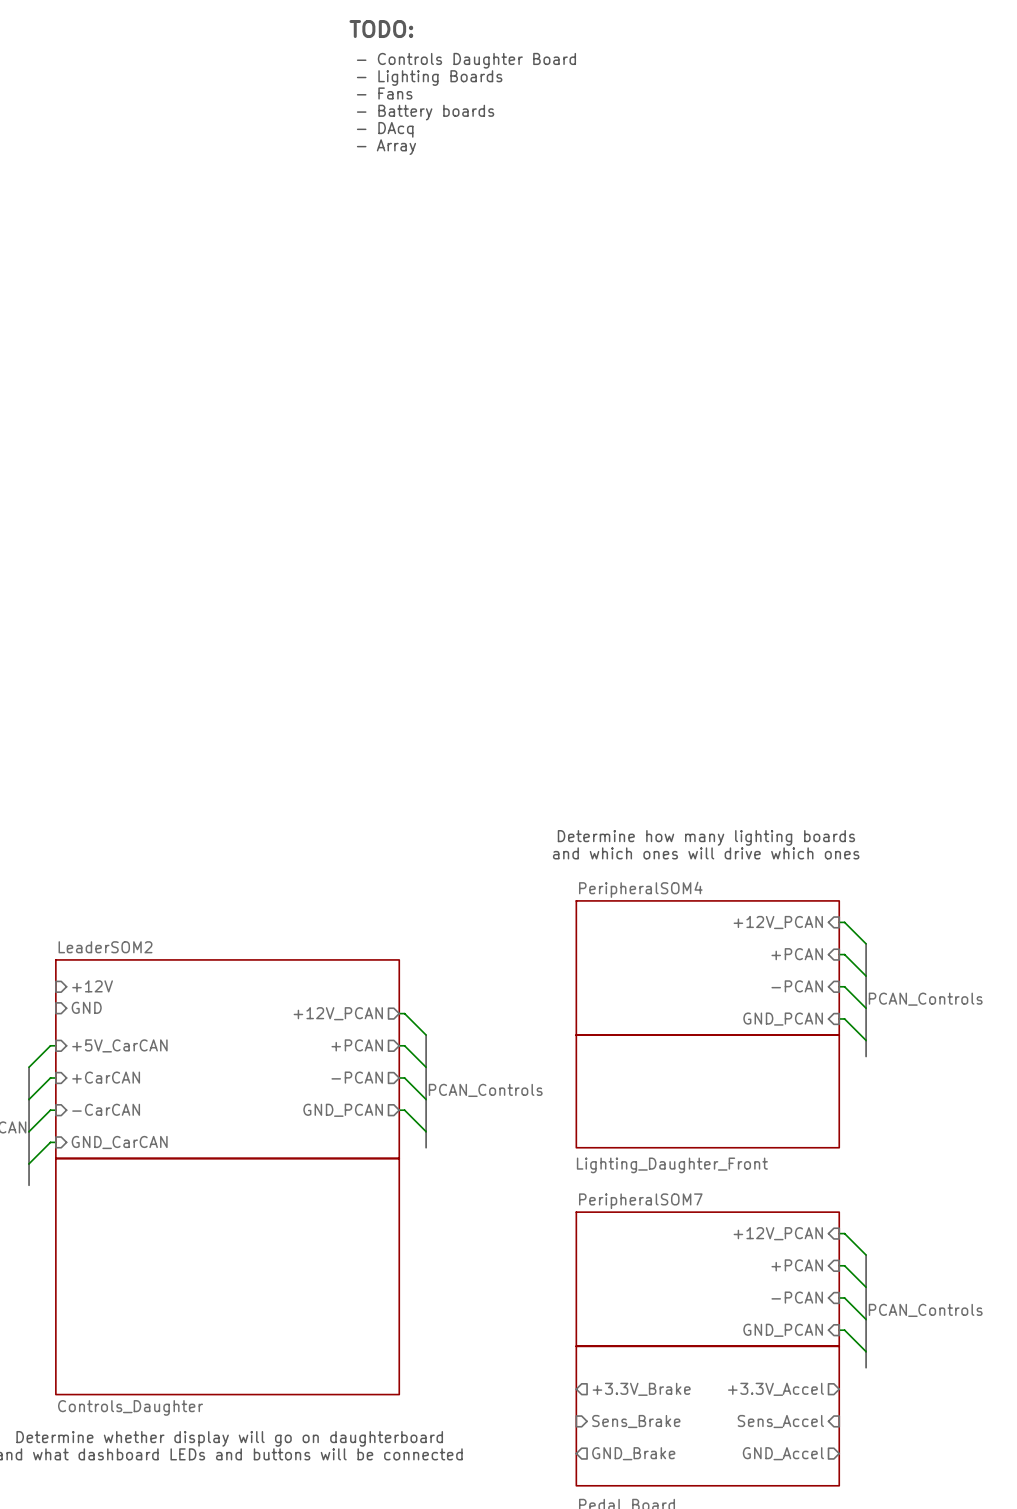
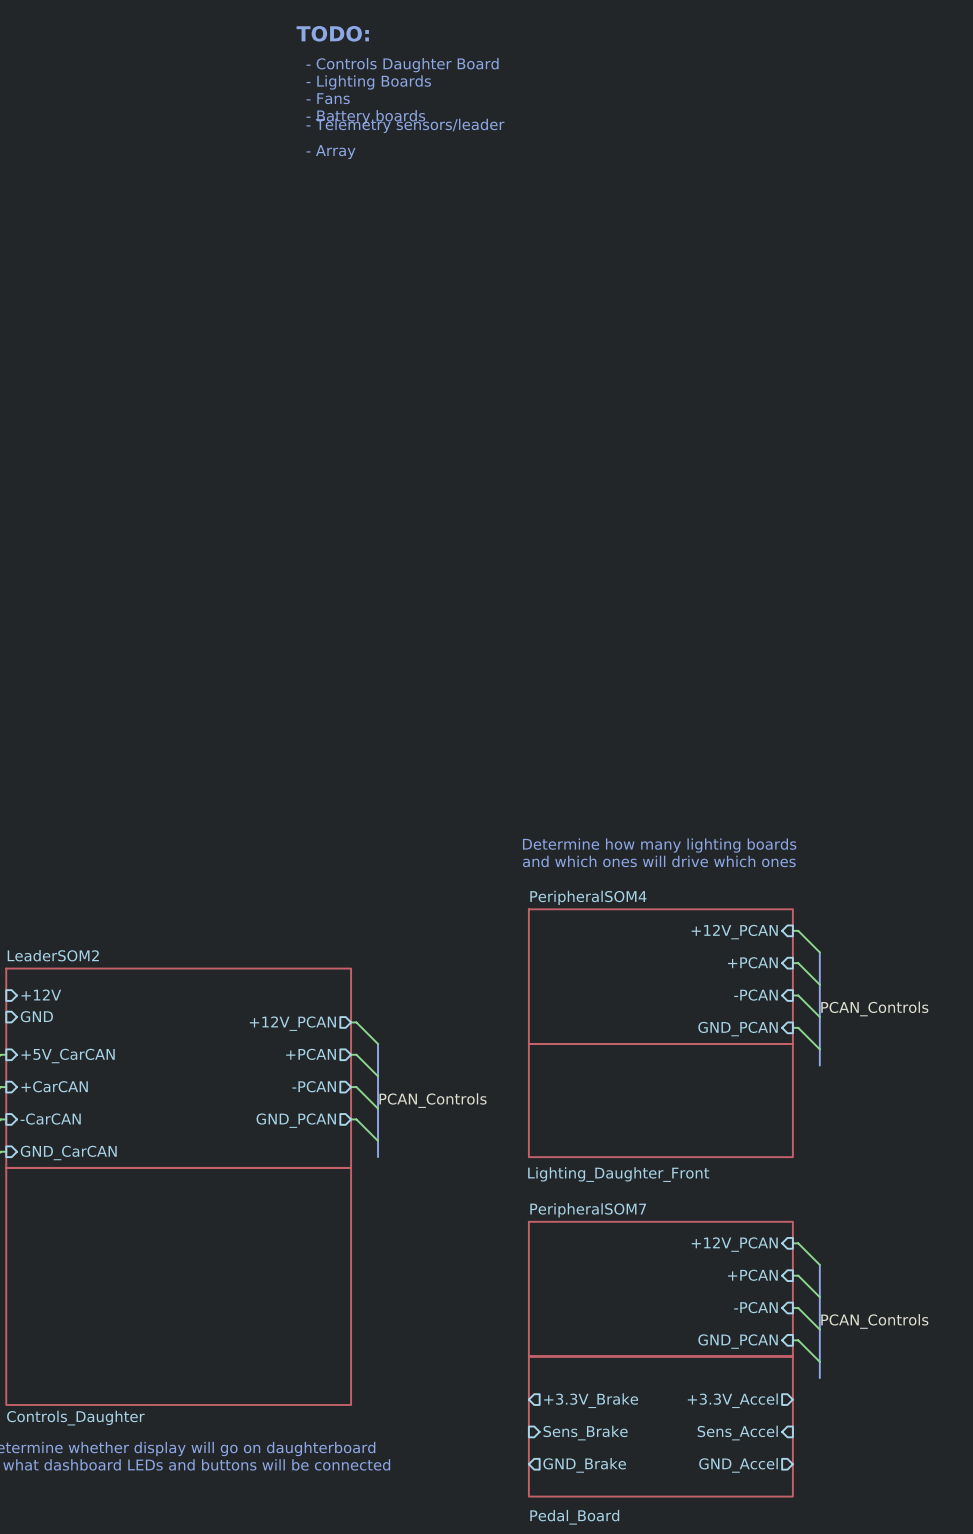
text: none -> - Telemetry sensors/leader (405, 125)
text: - DAcq (385, 129) -> none

